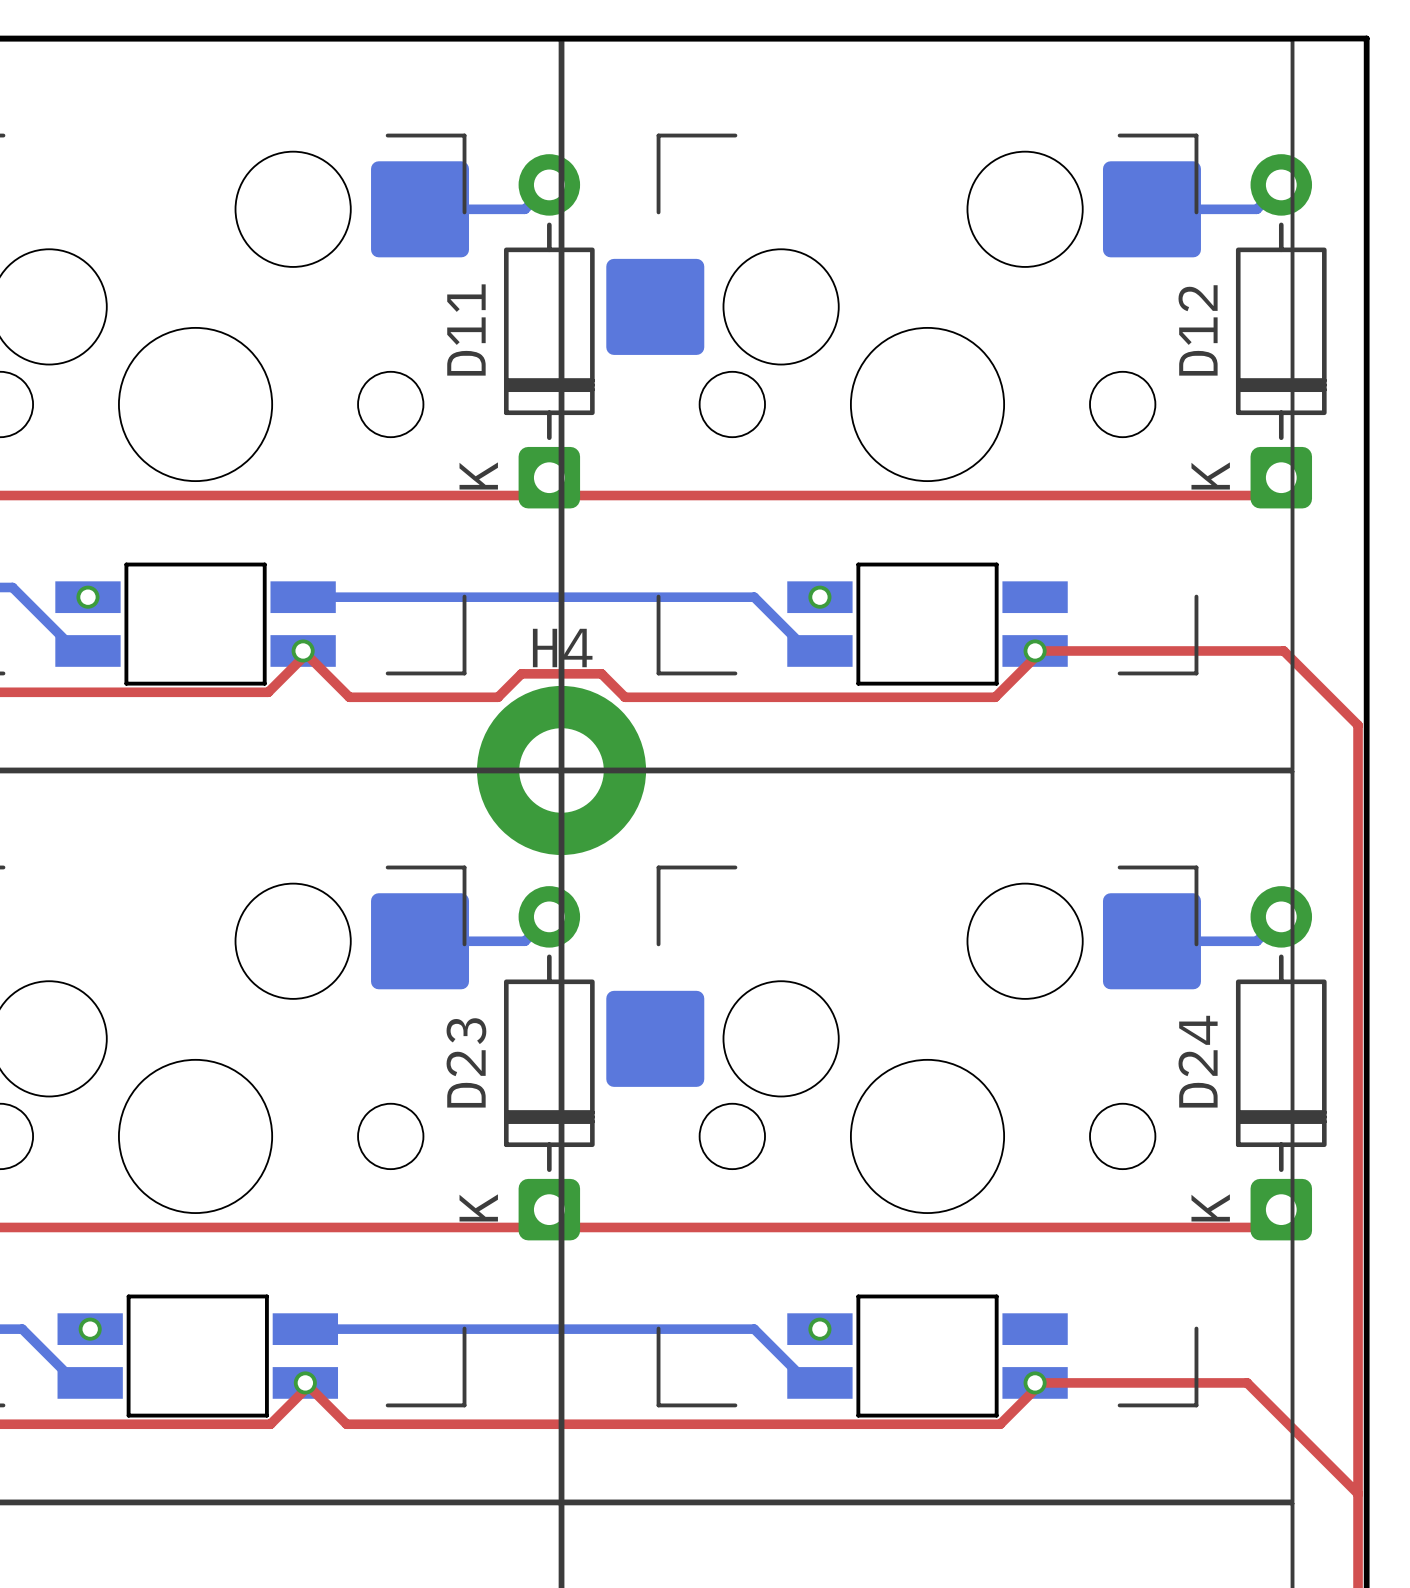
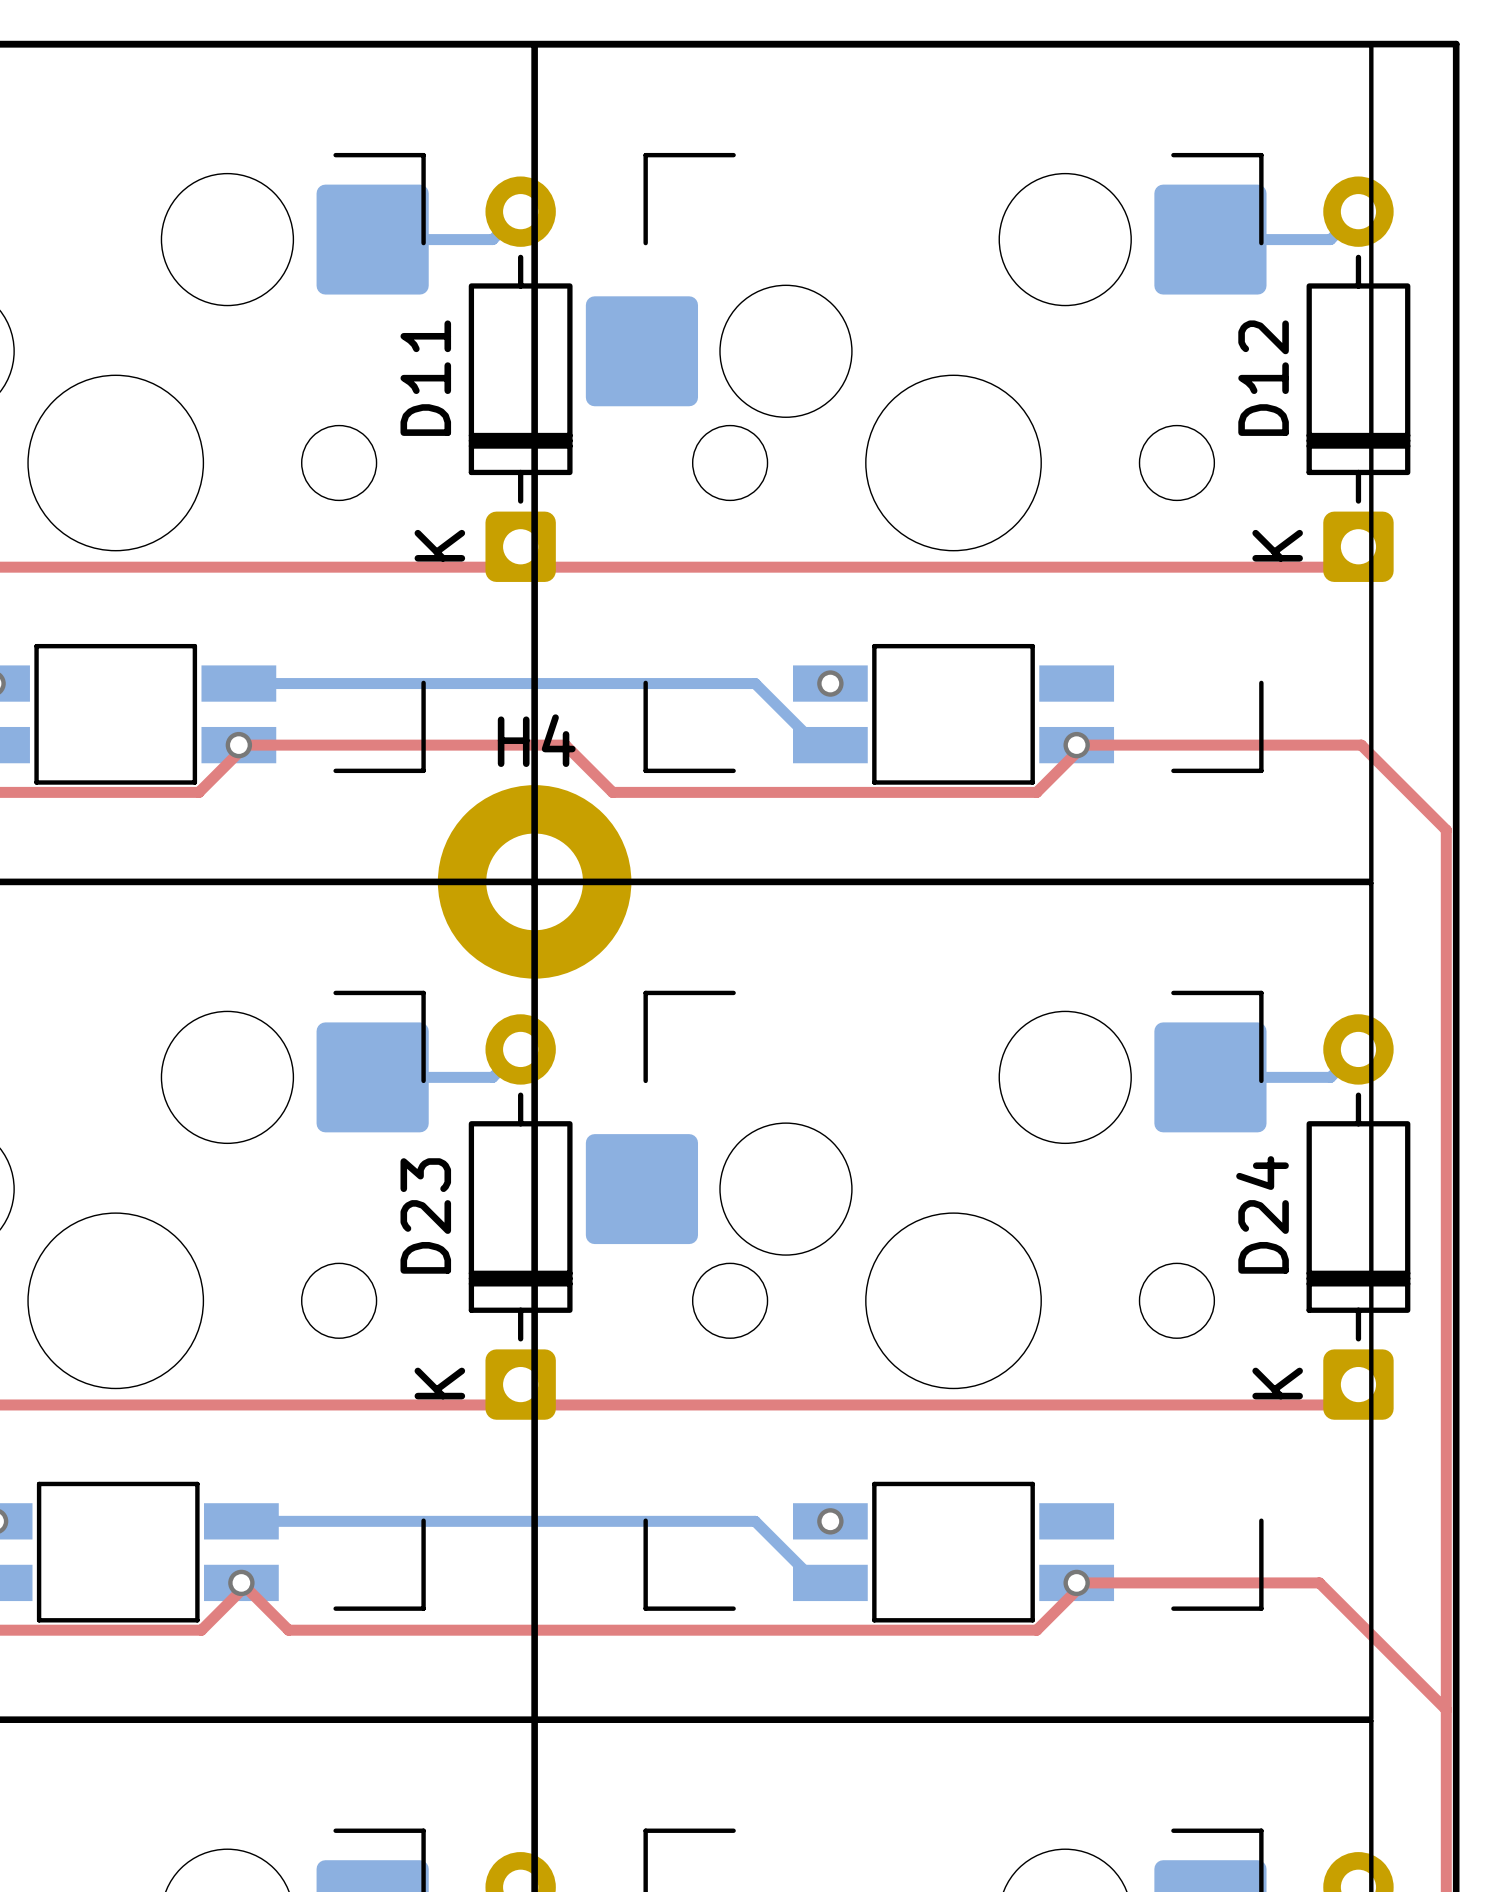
top track: (303, 650) (349, 697) (498, 697) (521, 673) (601, 673) (624, 697) (995, 697) (1000, 692) -> (238, 745) (565, 745) (612, 792) (1036, 792)

